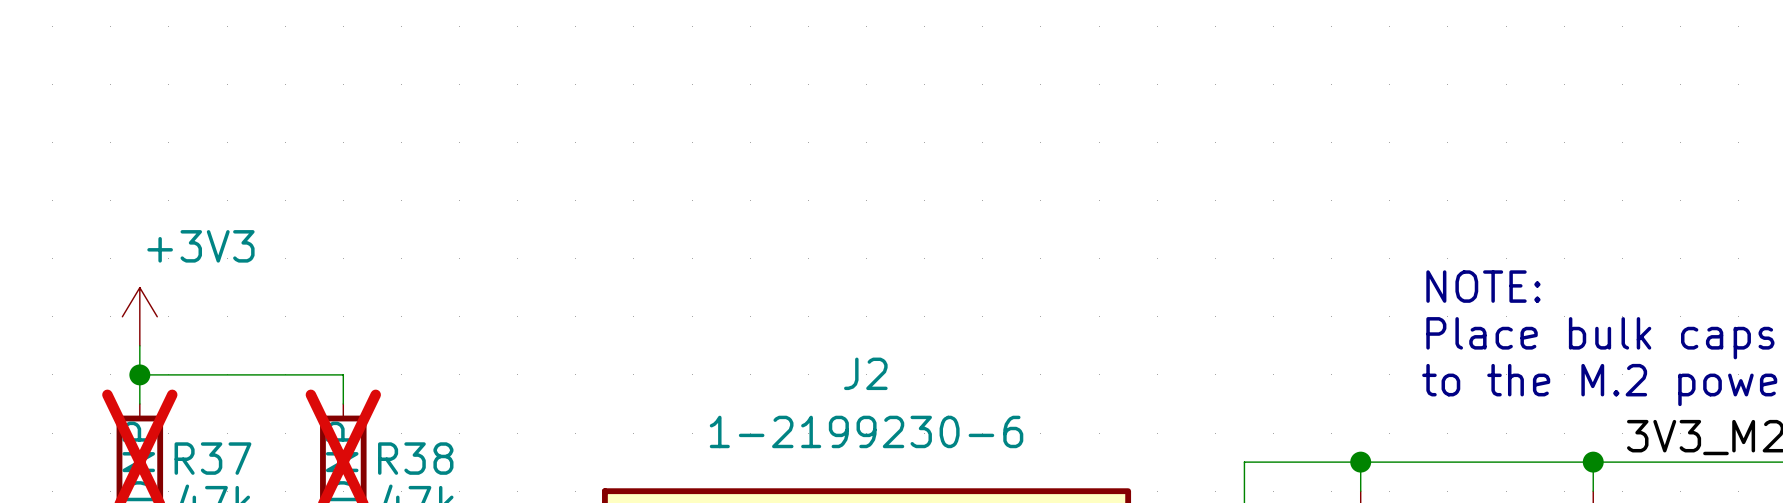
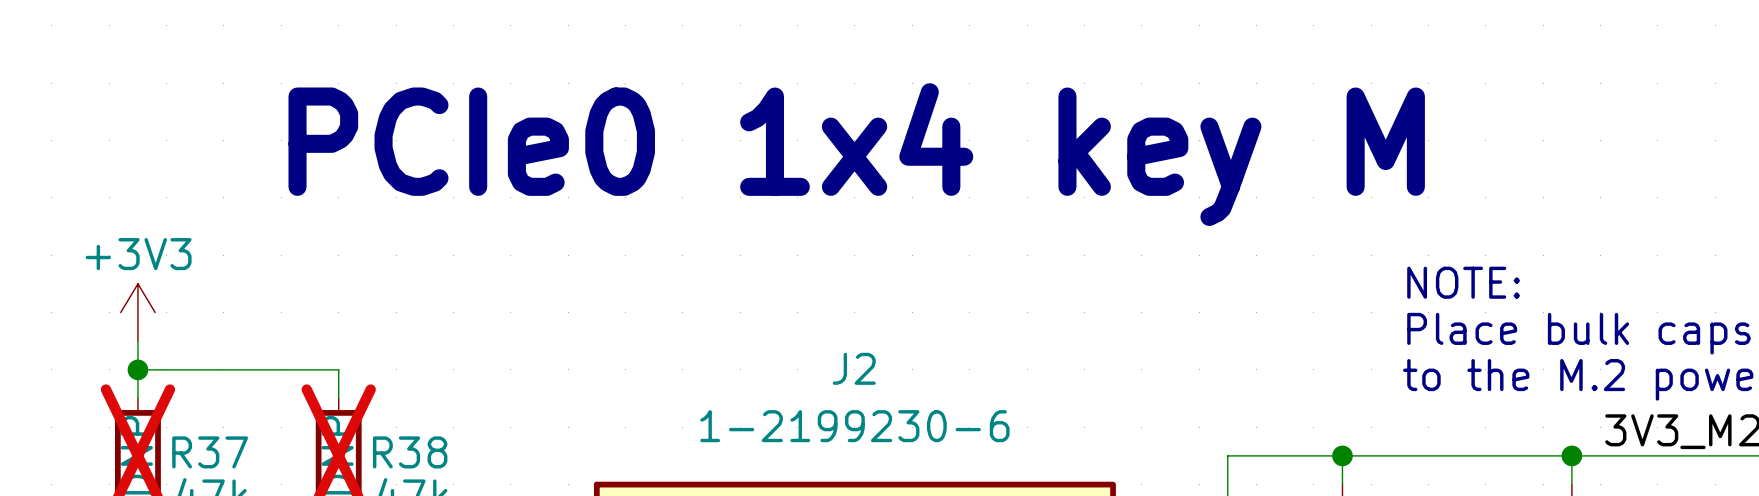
text: none -> PCIe0 1x4 key M (856, 154)
power symbol text position: +3V3 (200, 246) -> +3V3 (138, 254)

